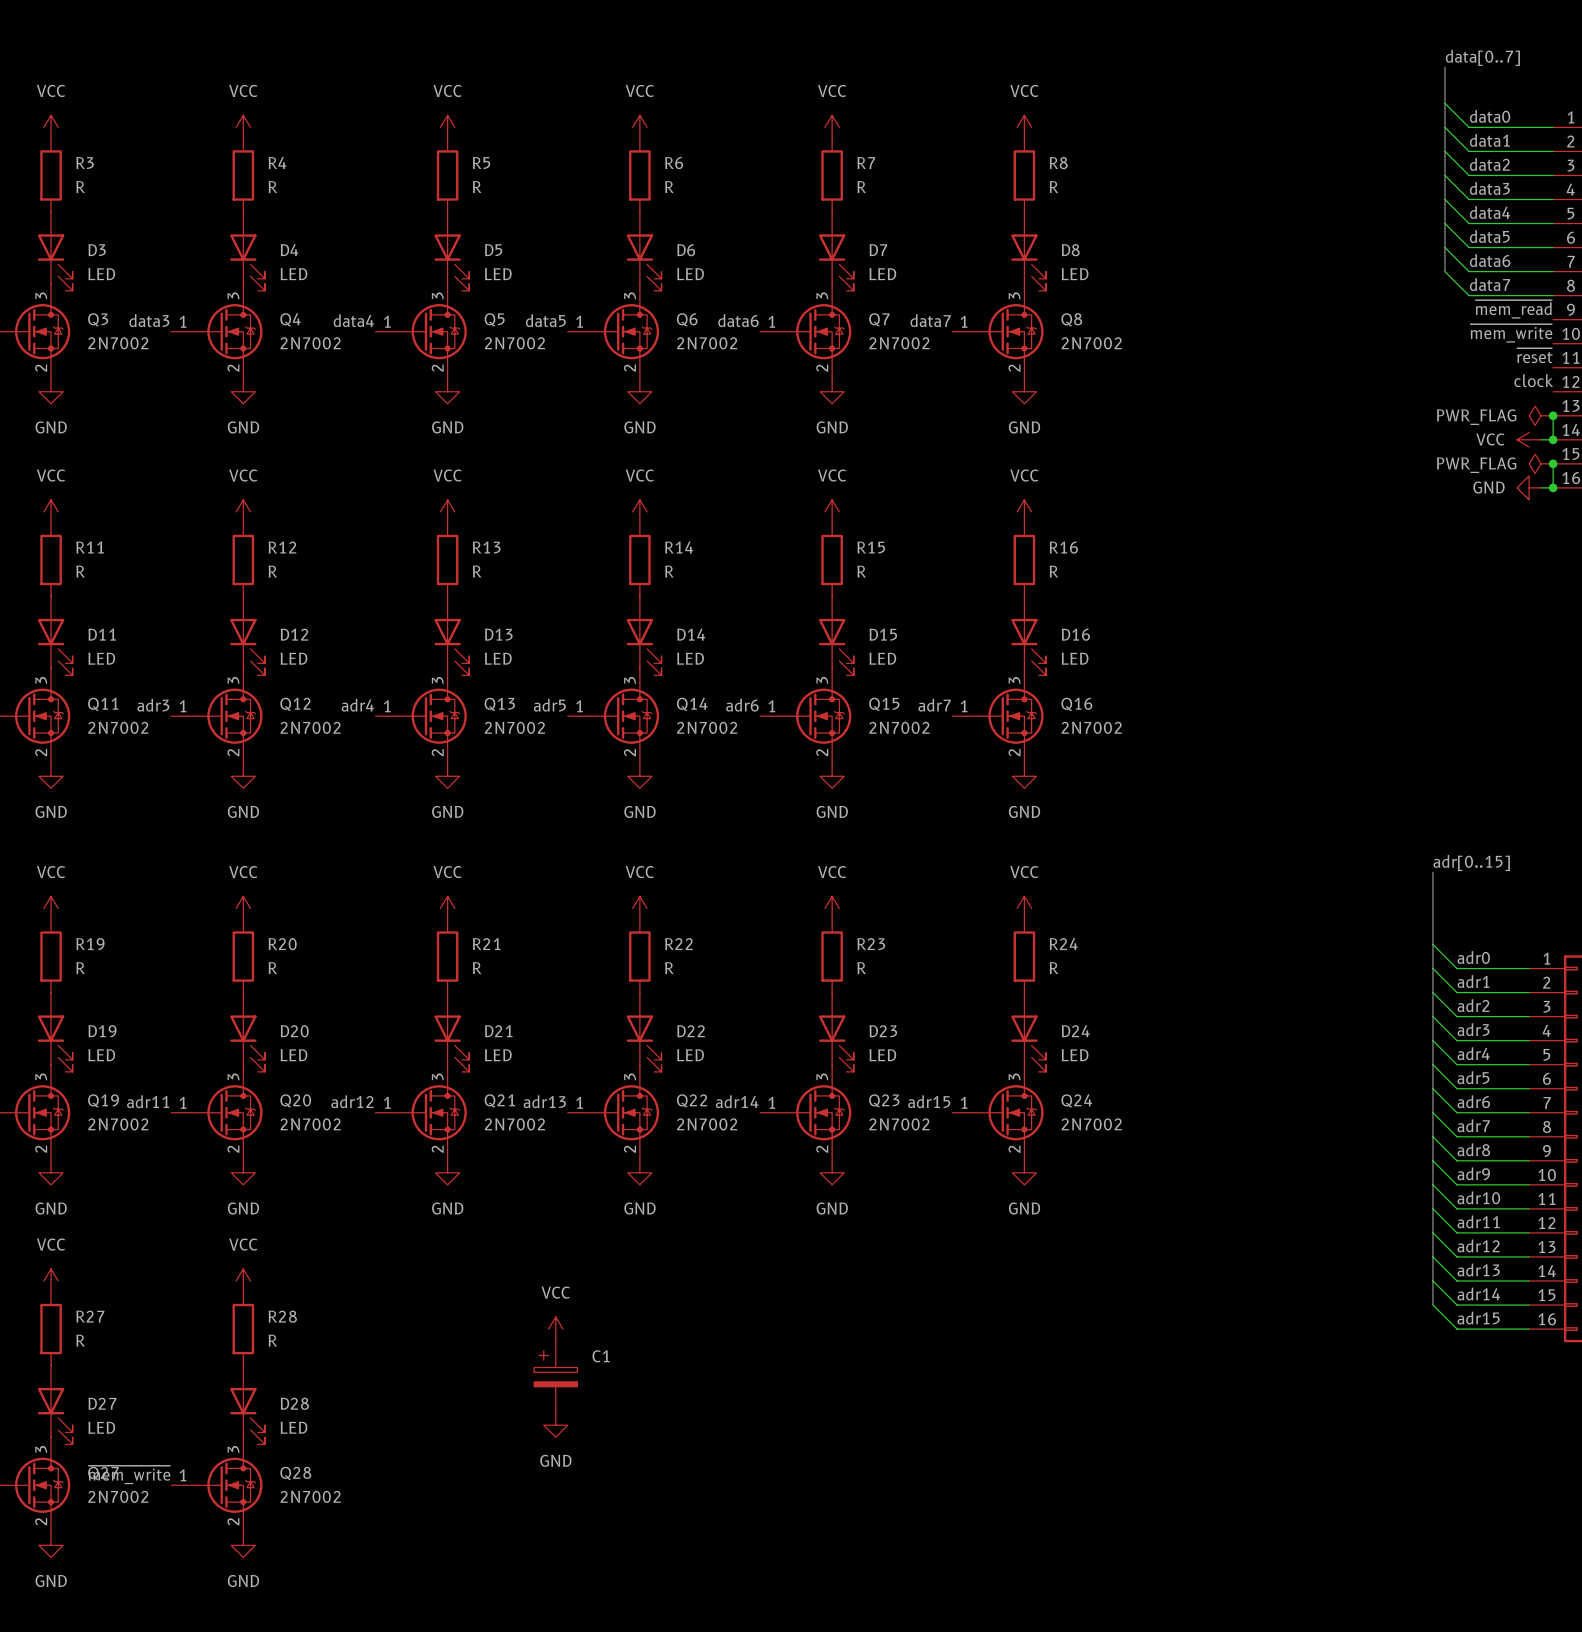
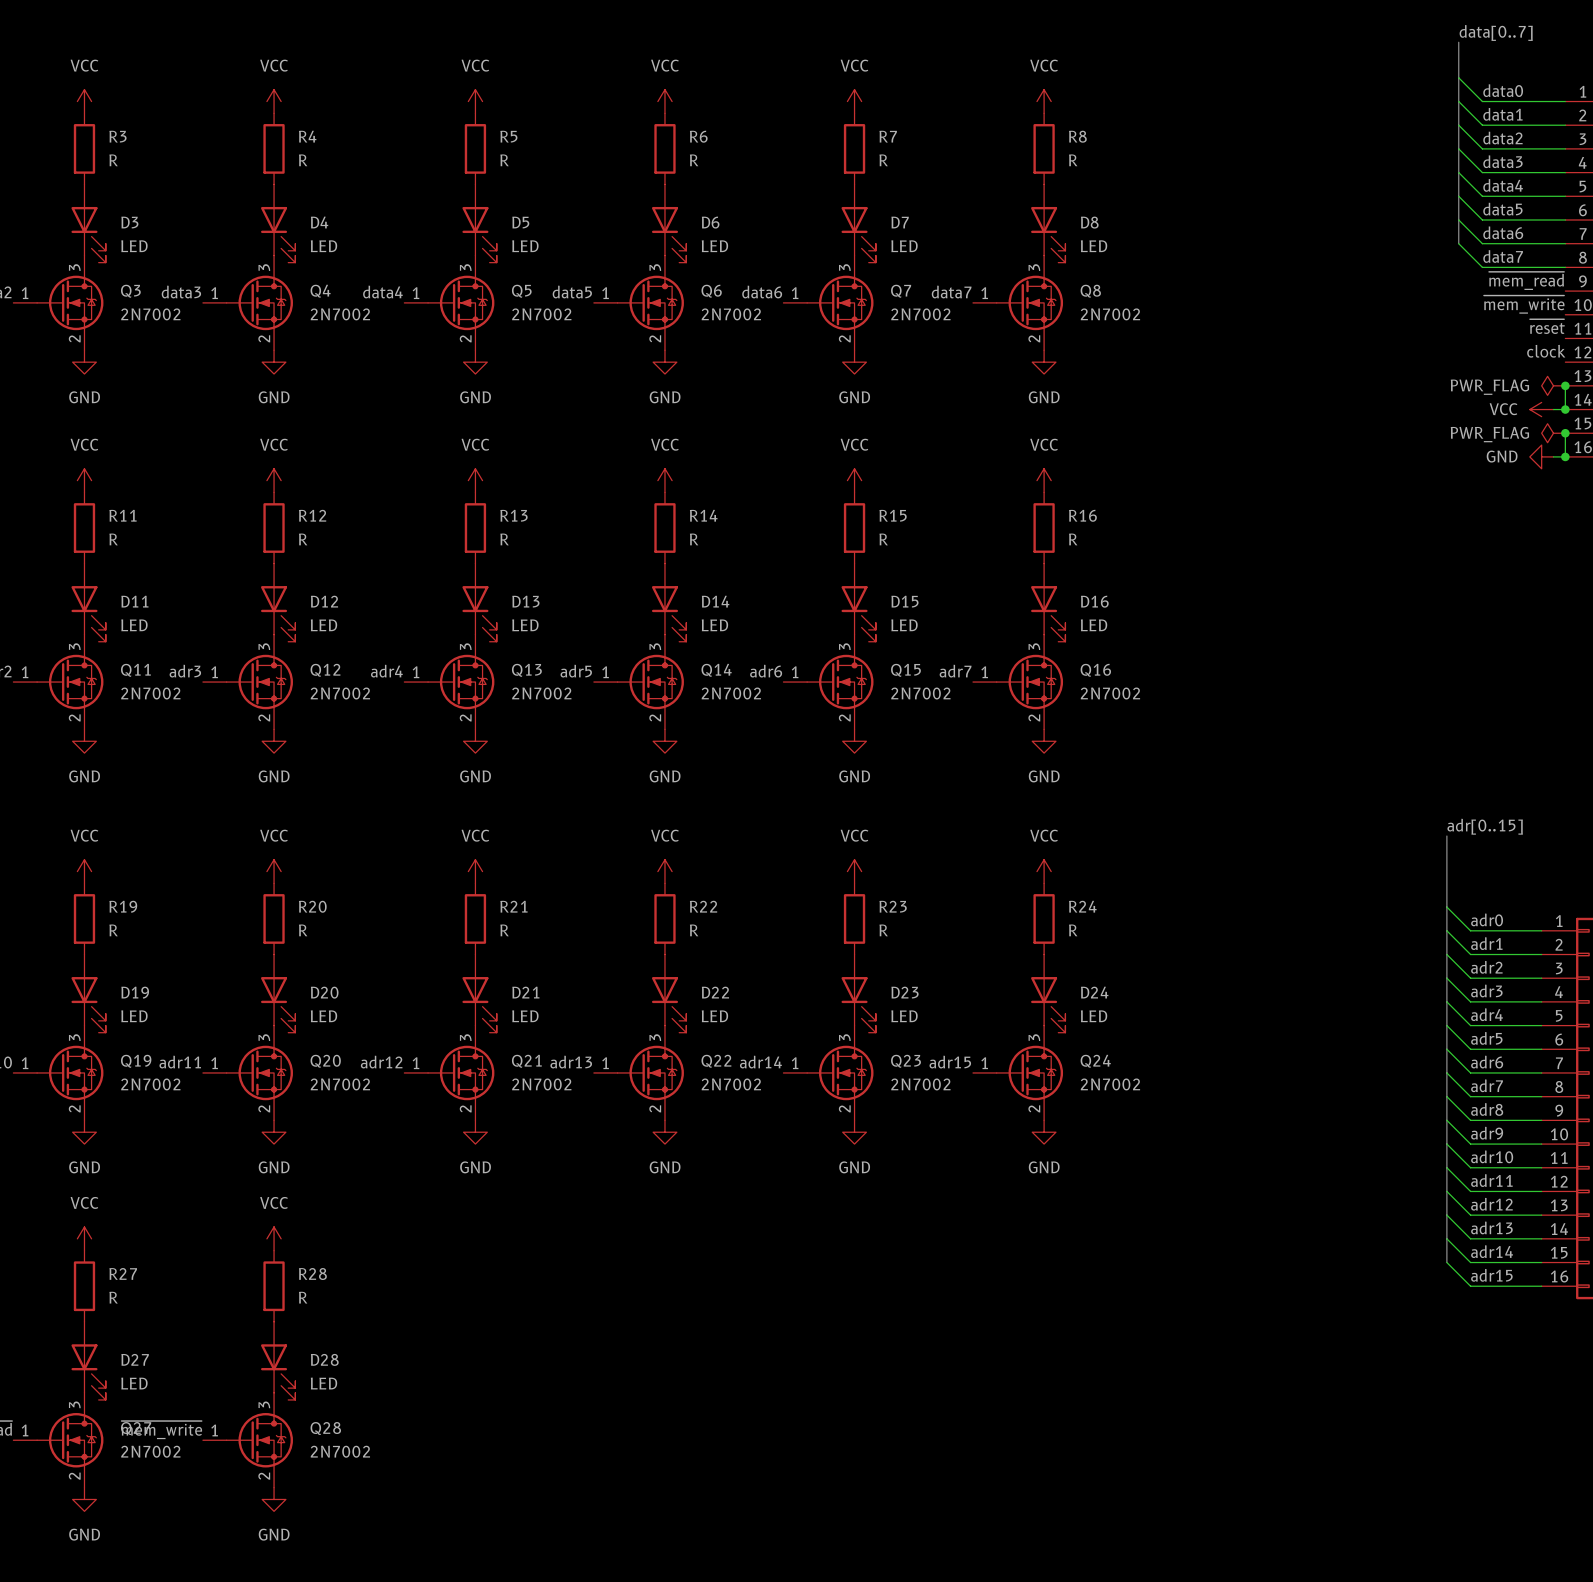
power symbol: VCC (555, 1329) -> none
C1: (555, 1377) -> none
power symbol: GND (555, 1425) -> none

